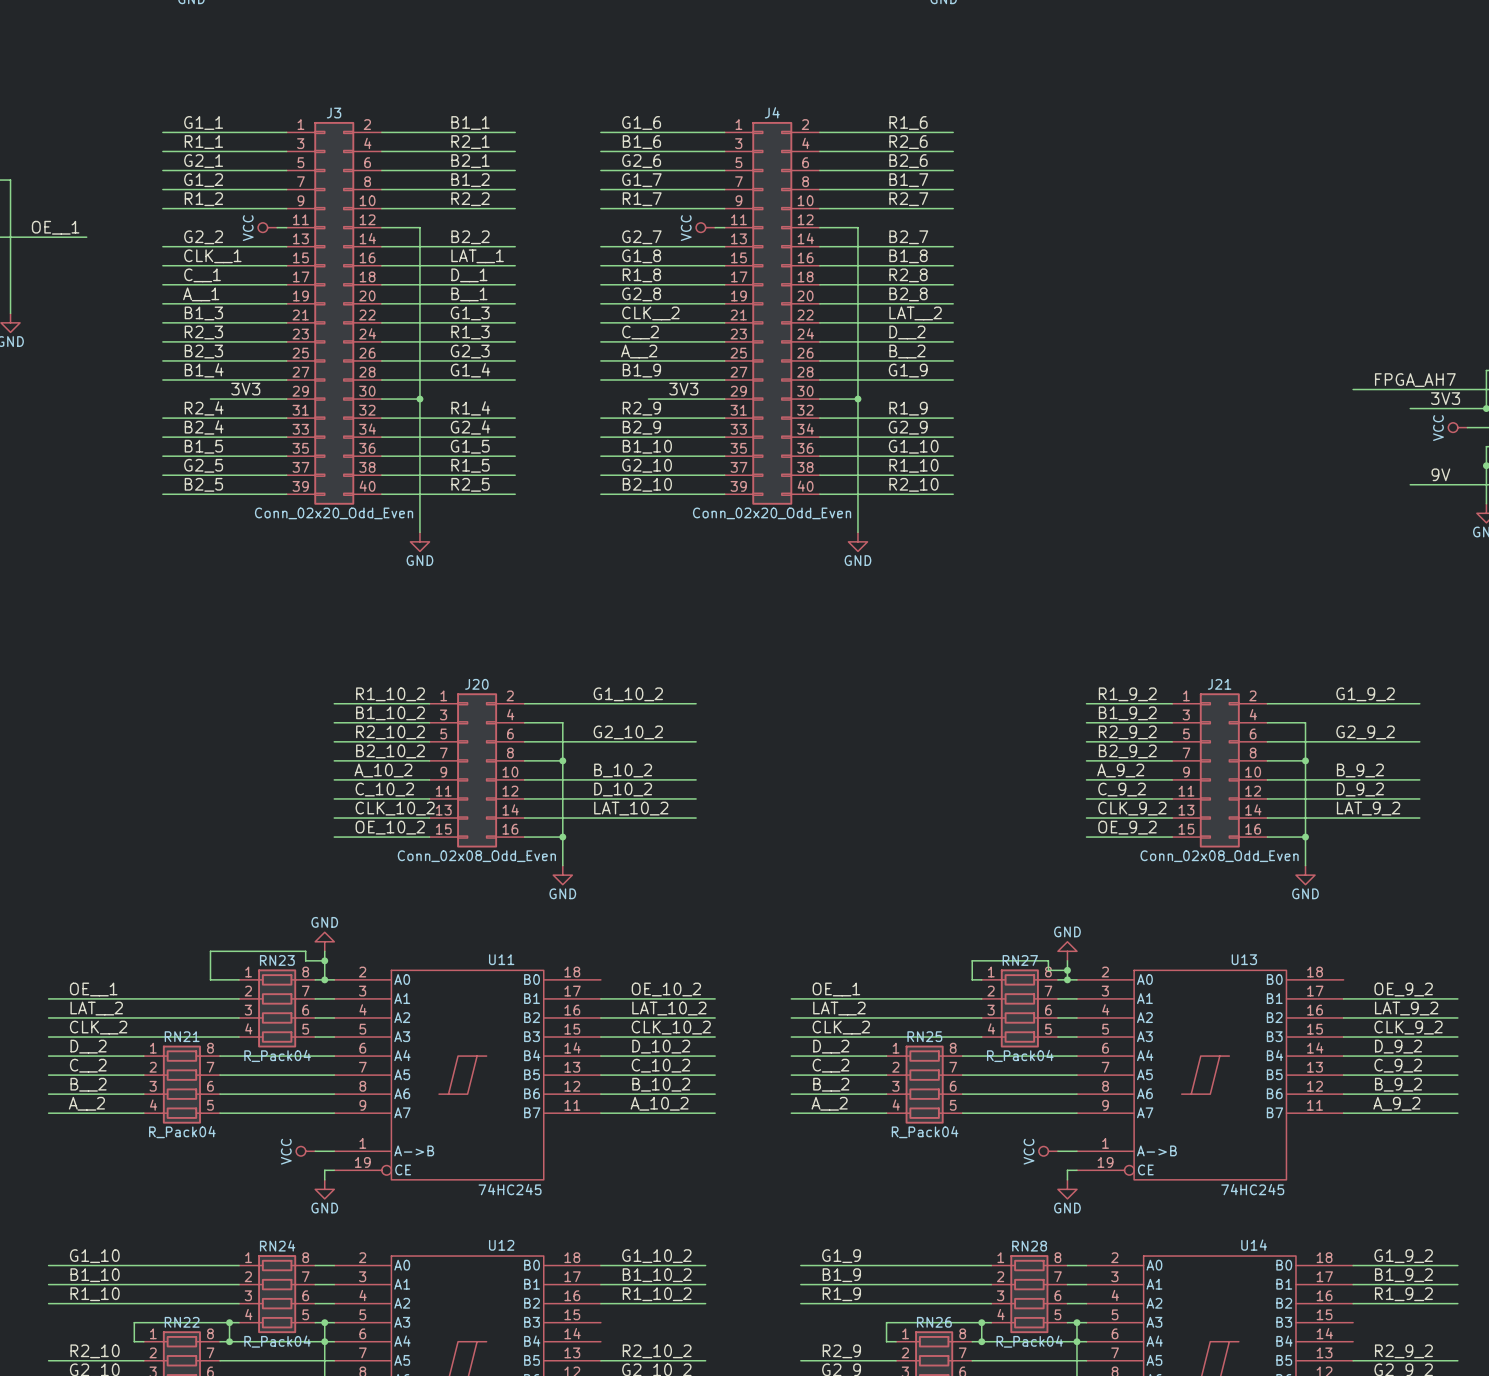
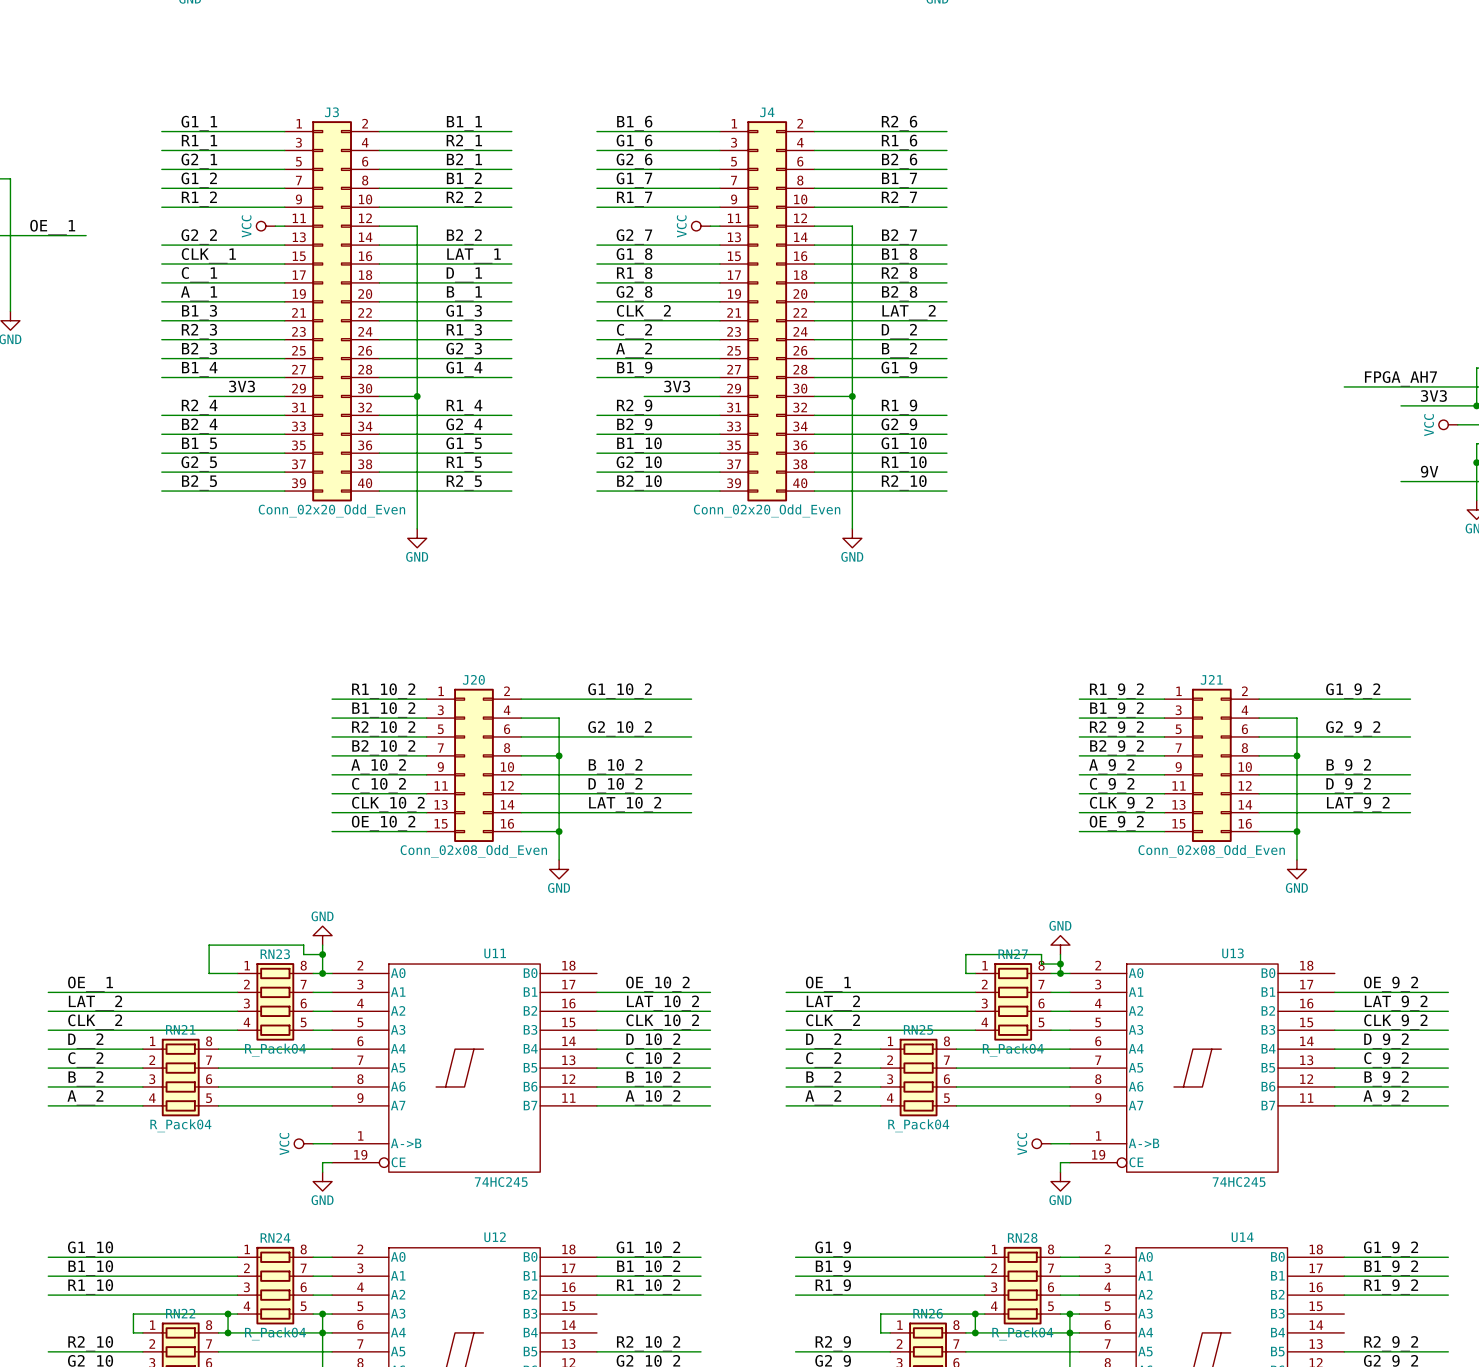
label: G1_6 (641, 123) -> B1_6 (634, 123)
label: R1_6 (908, 123) -> R2_6 (899, 123)
label: B1_6 (641, 142) -> G1_6 (634, 142)
label: R2_6 (908, 142) -> R1_6 (899, 142)

